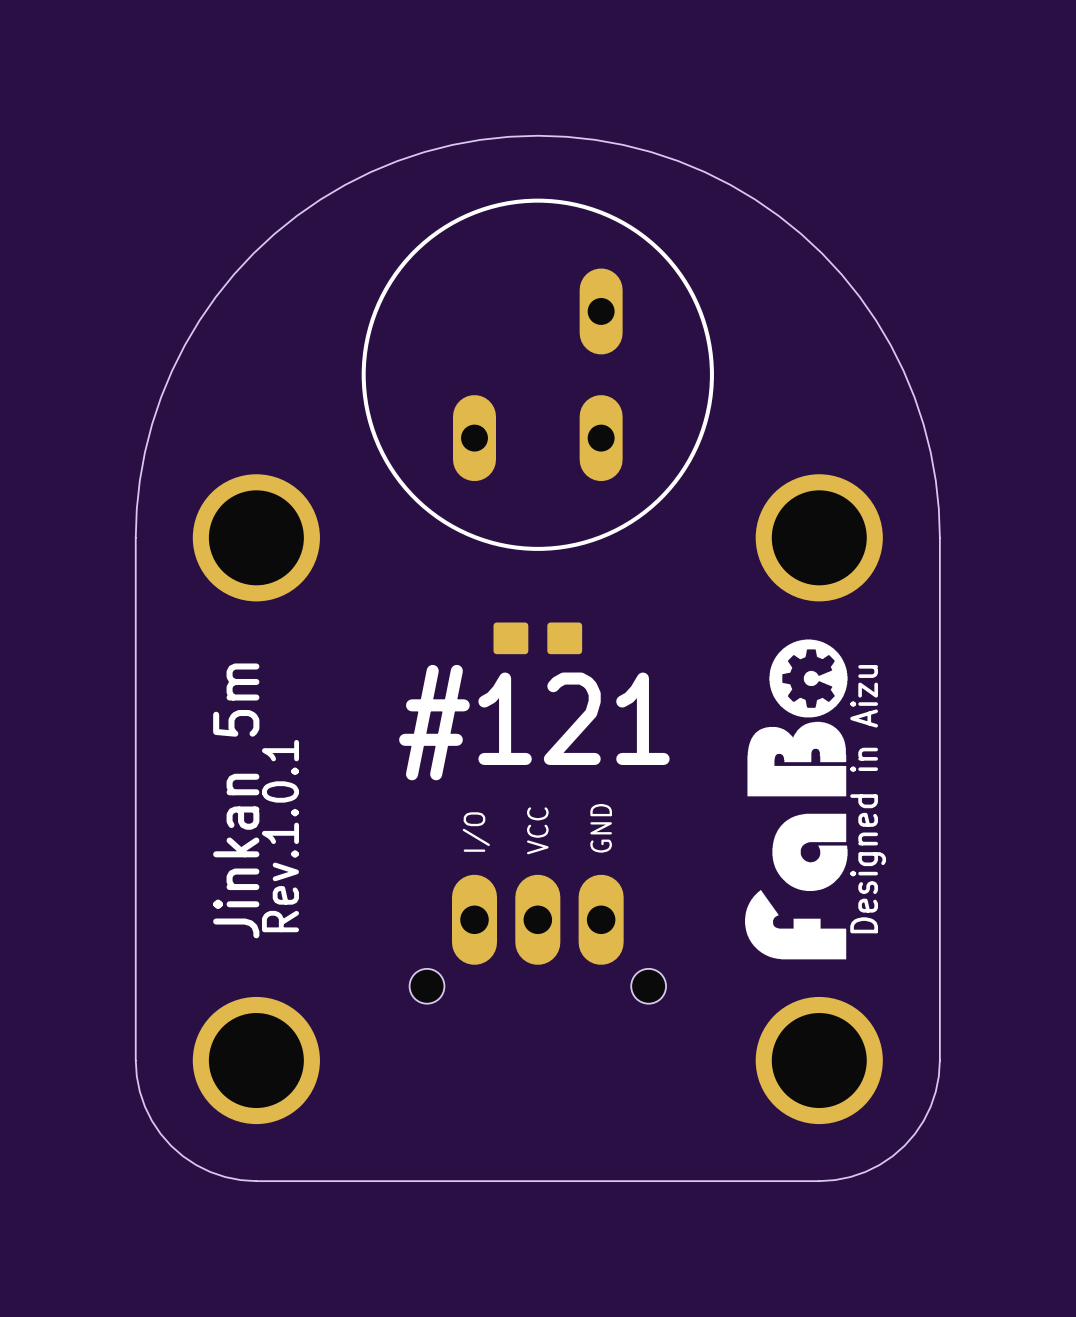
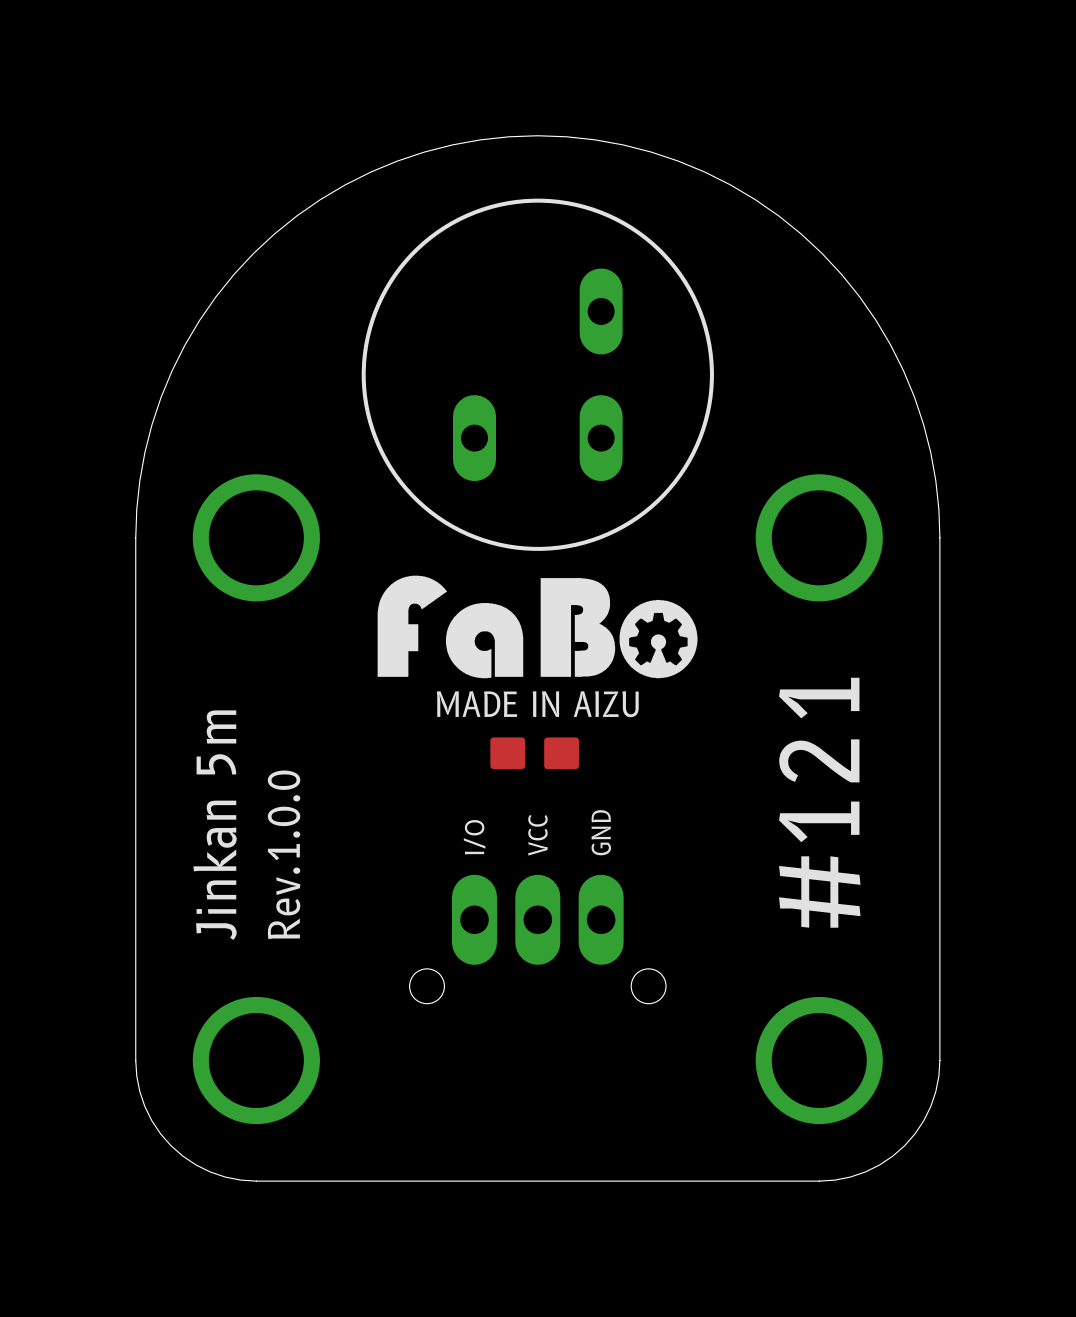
drawing: none -> [377, 575, 698, 679]
part position: (537, 638) -> (534, 753)
drawing: [745, 639, 848, 960] -> none
text: none -> MADE IN AIZU (537, 704)
text rotation: 0° (534, 722) -> 90° counterclockwise (819, 802)
text: Designed in Aizu (868, 799) -> none
text position: Jinkan 5m (236, 800) -> Jinkan 5m (215, 825)
text: Rev.1.0.1 (280, 836) -> Rev.1.0.0 (284, 854)

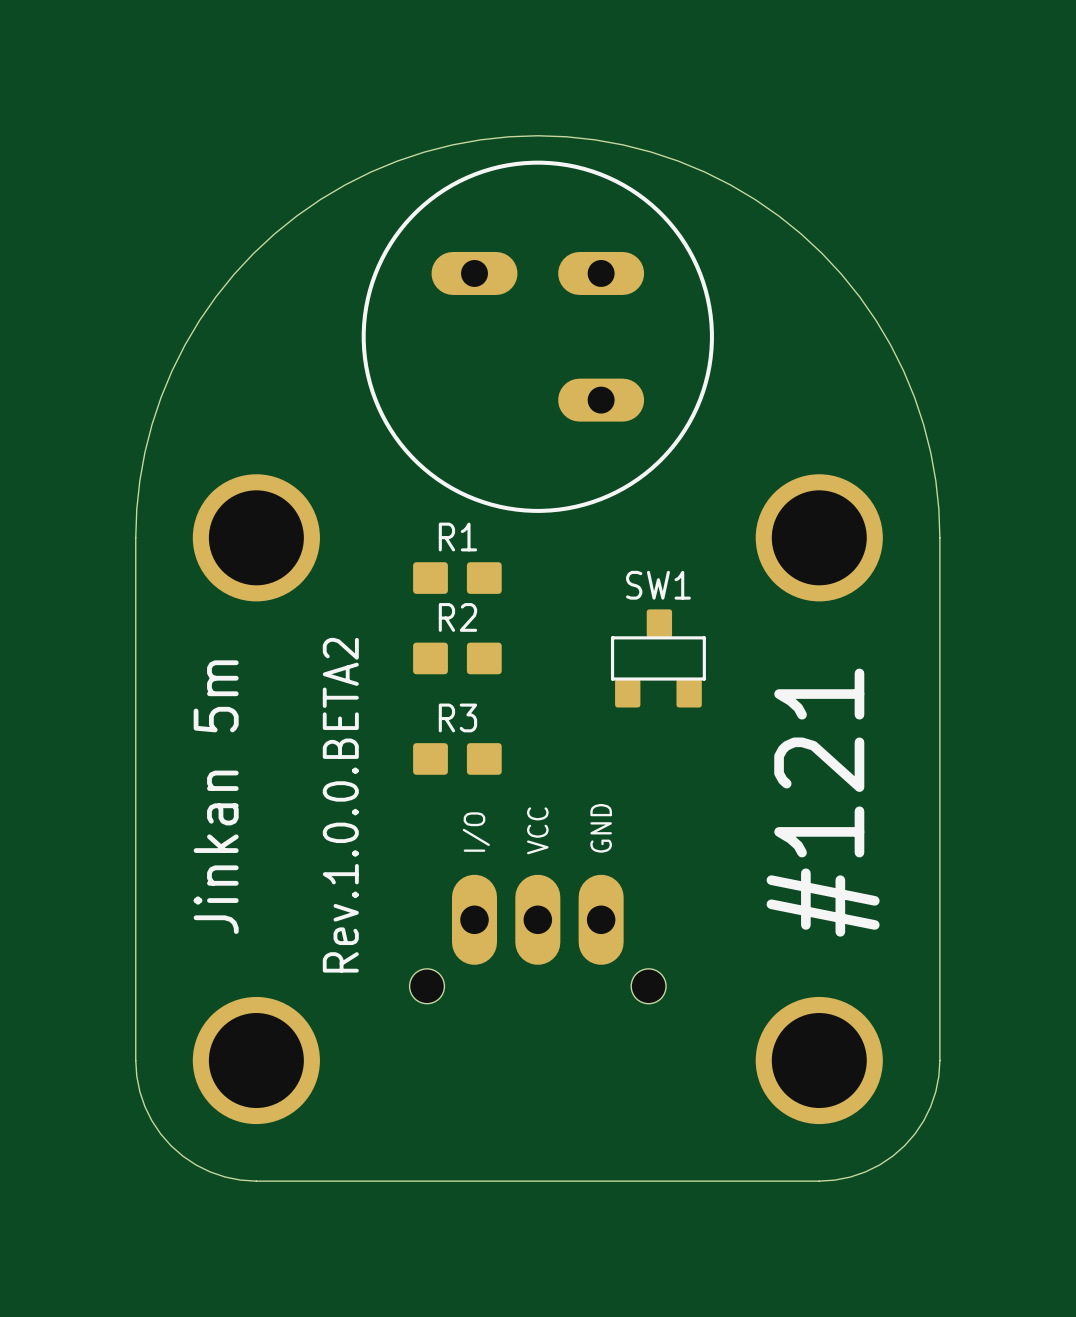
part rotation: 0° (537, 374) -> 90° counterclockwise (537, 336)
drawing: [377, 575, 698, 679] -> none
R1: none -> (457, 578)
R2: none -> (457, 658)
SW1: none -> (658, 658)
text: MADE IN AIZU (537, 704) -> none
part: (534, 753) -> none
R3: none -> (457, 758)
text: Rev.1.0.0 (284, 854) -> Rev.1.0.0.BETA2 (340, 805)

